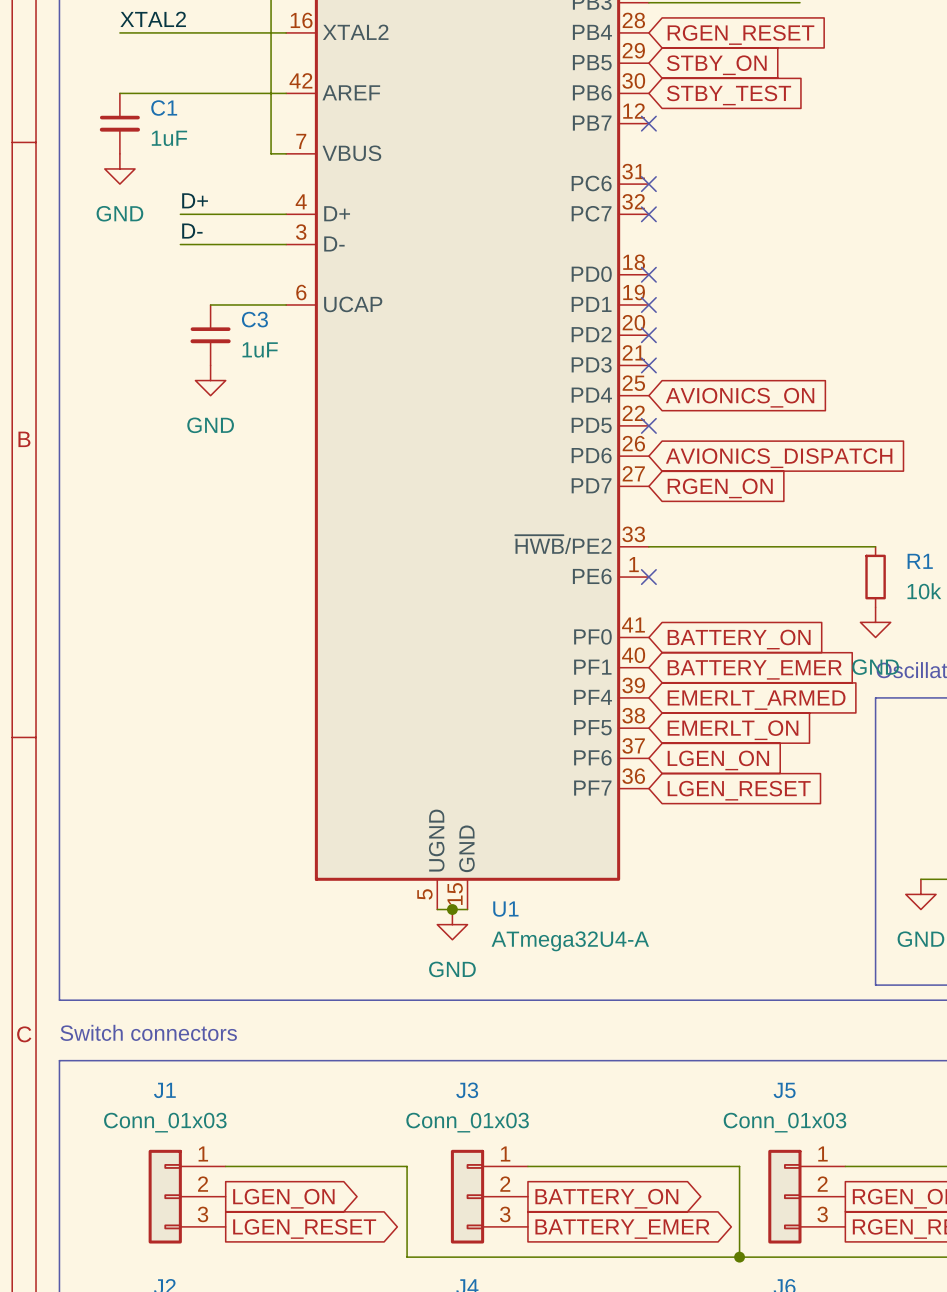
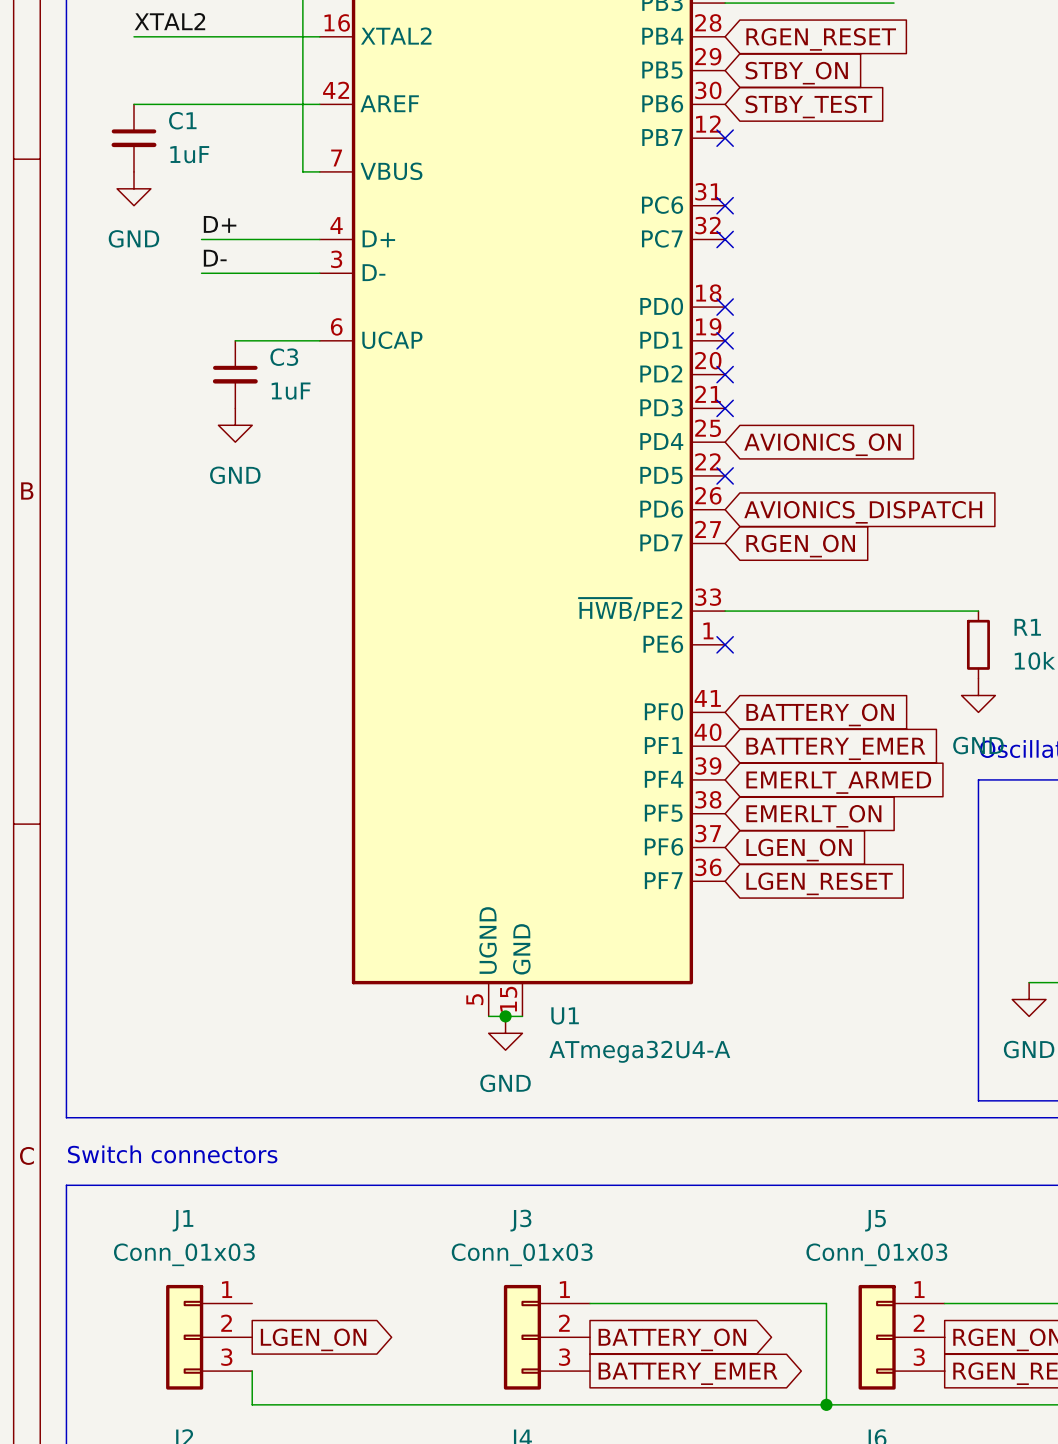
wire: (225, 1166) (407, 1166) (407, 1257) -> (252, 1371) (252, 1404) (454, 1404)
global label: LGEN_RESET (304, 1228) -> none

